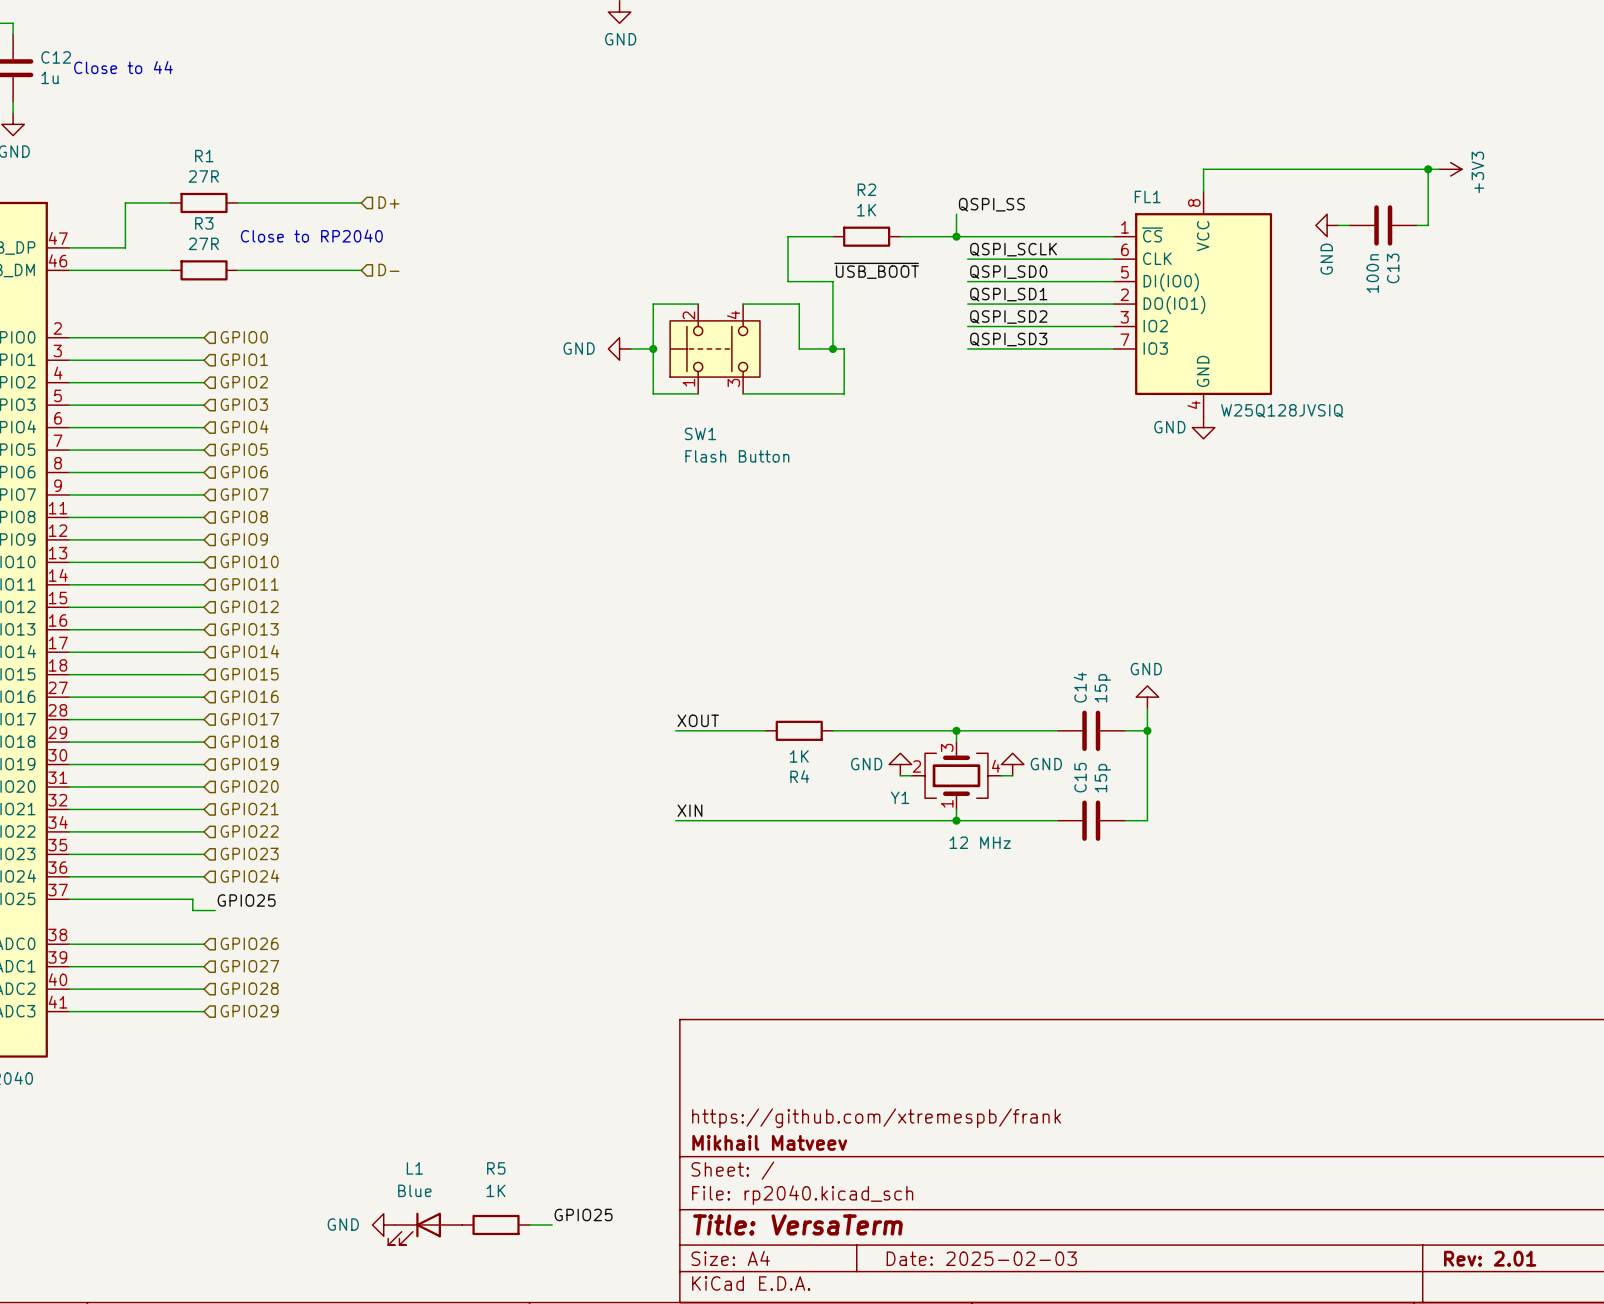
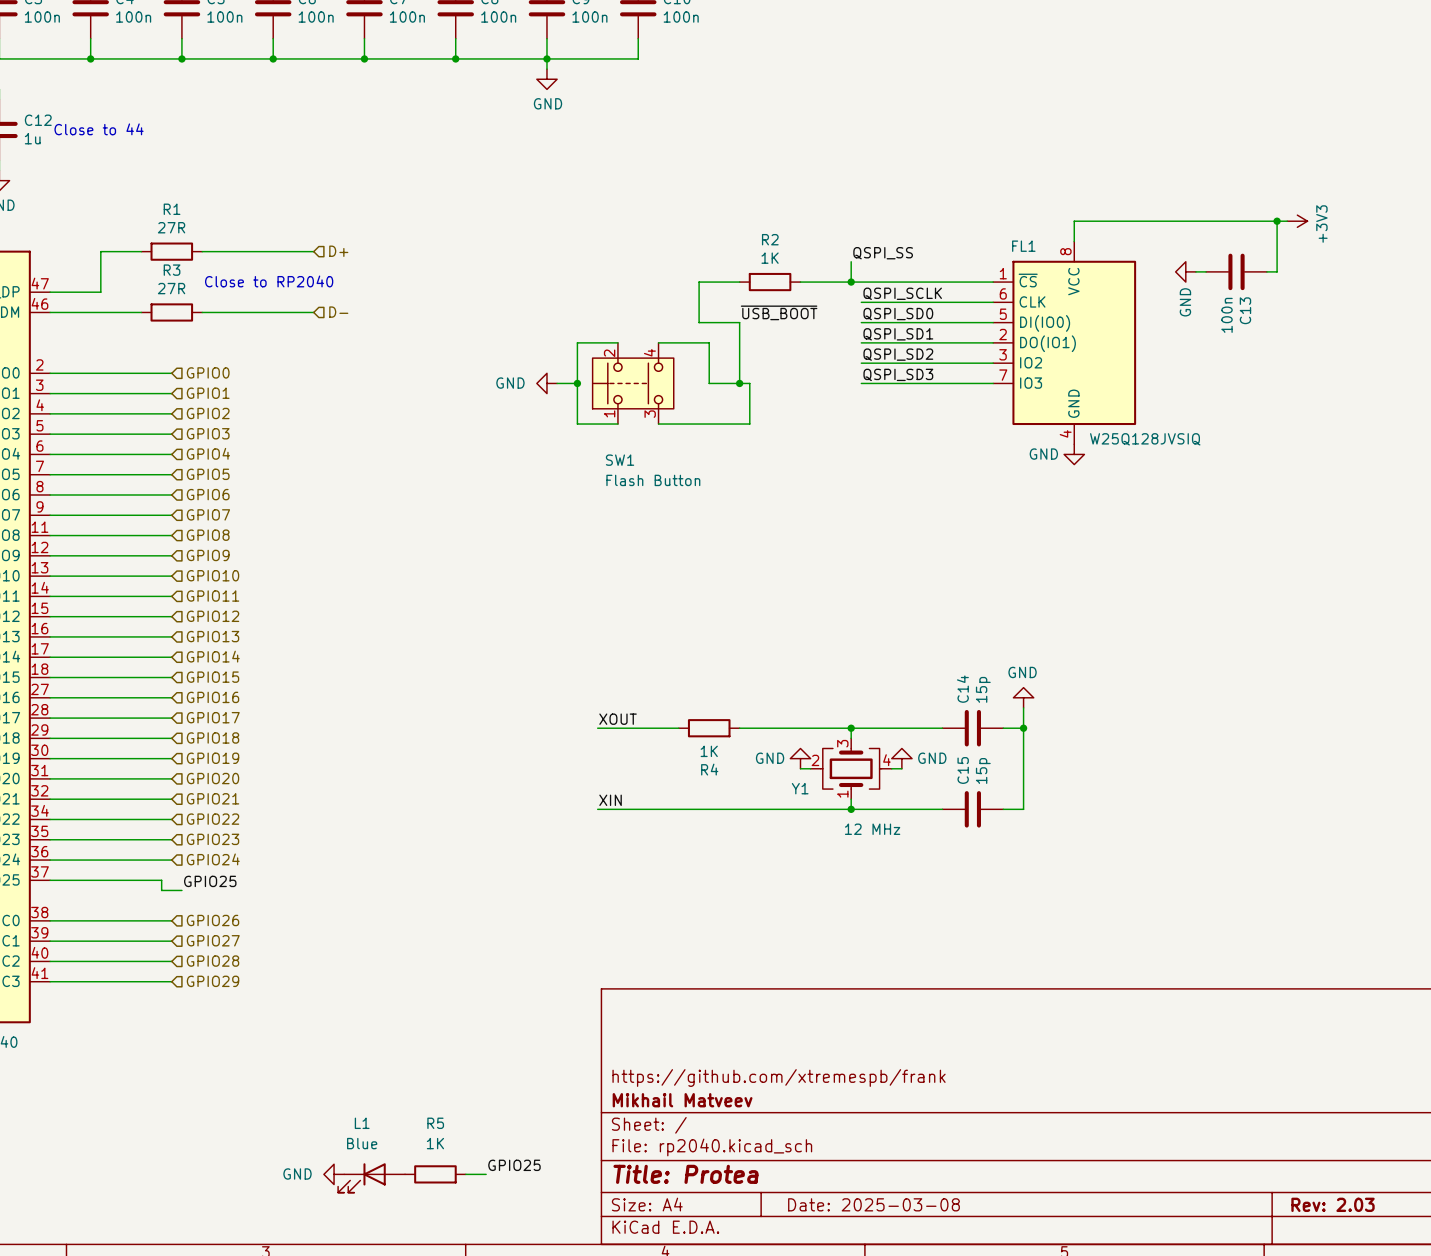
title block: Title: VersaTerm (798, 1224) -> Title: Protea (686, 1174)
title block: Date: 2025-02-03 (981, 1258) -> Date: 2025-03-08 (873, 1204)
title block: Rev: 2.01 (1490, 1258) -> Rev: 2.03 (1333, 1204)

